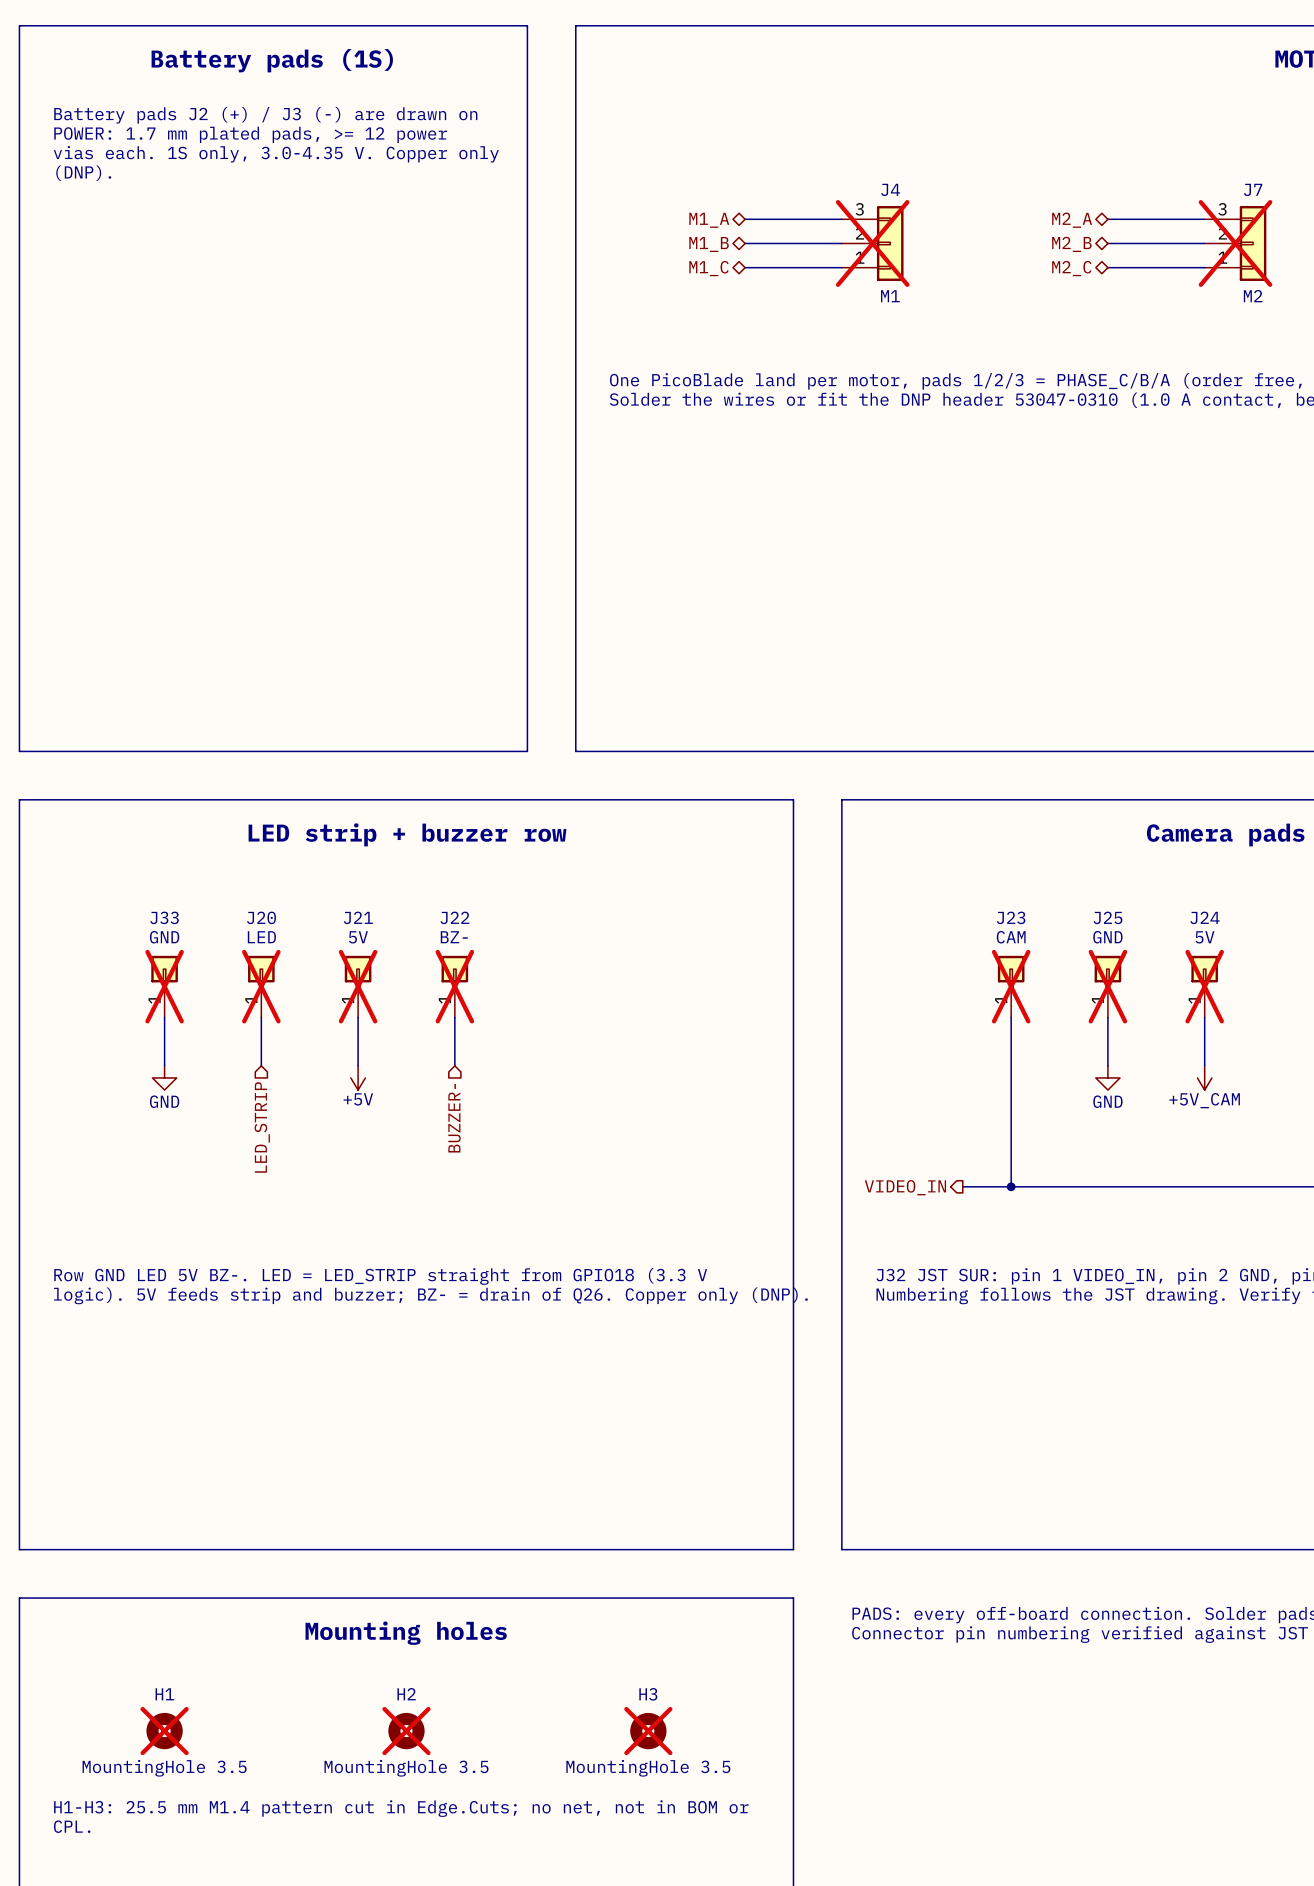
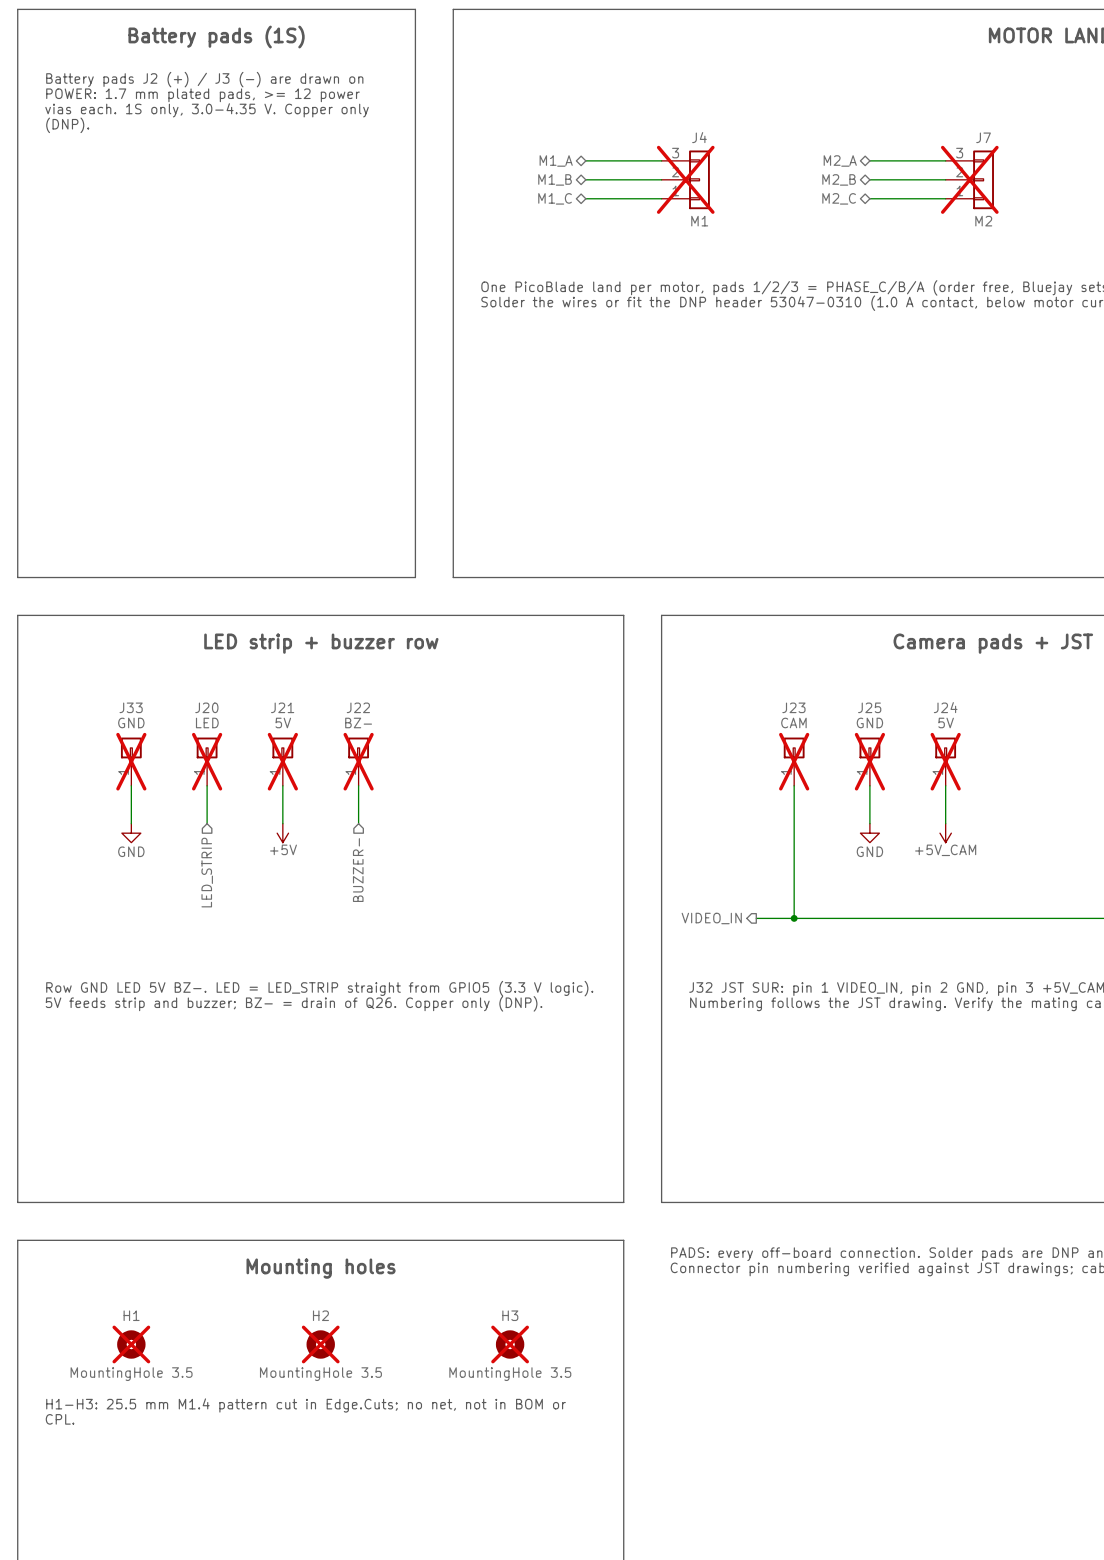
text: Row GND LED 5V BZ-. LED = LED_STRIP straight from GPIO18 (3.3 V (380, 1276) -> Row GND LED 5V BZ-. LED = LED_STRIP straight from GPIO5 (3.3 V logic). (319, 988)
text: logic). 5V feeds strip and buzzer; BZ- = drain of Q26. Copper only (DNP). (430, 1295) -> 5V feeds strip and buzzer; BZ- = drain of Q26. Copper only (DNP). (294, 1003)

